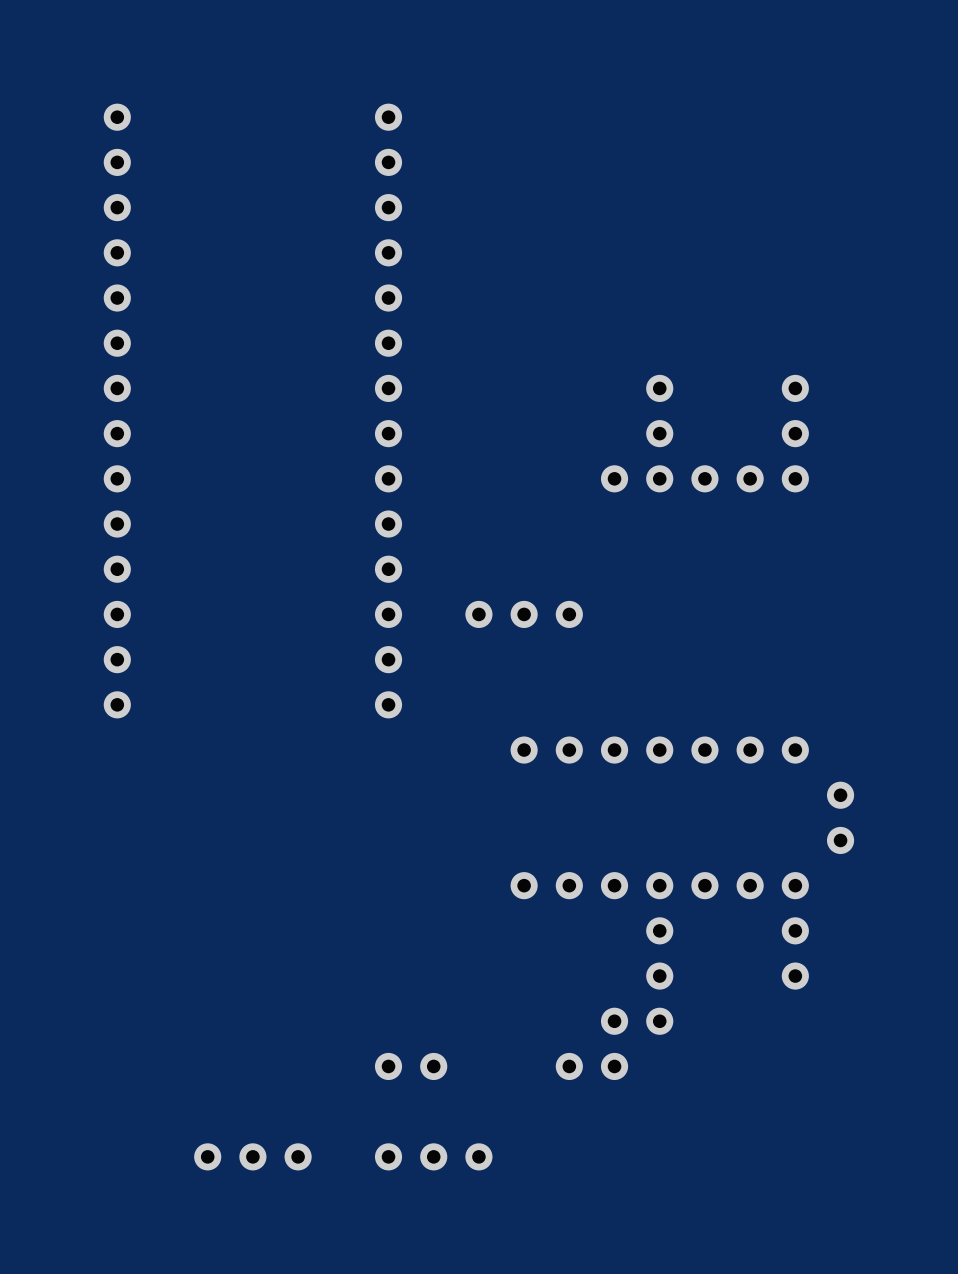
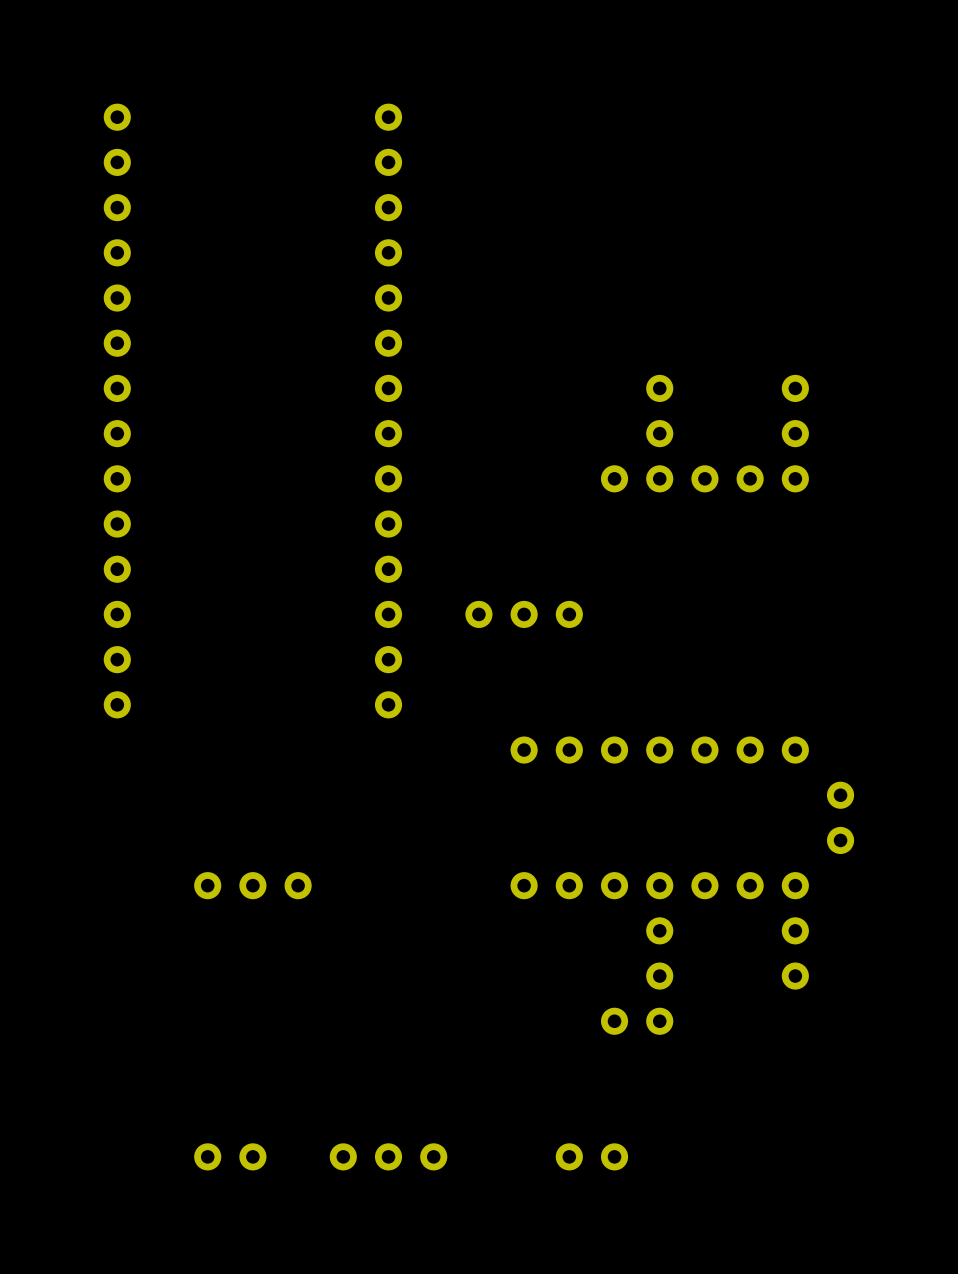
part: none -> (252, 885)
part: (411, 1066) -> none
part position: (591, 1066) -> (591, 1156)
part: (252, 1156) -> none
part position: (433, 1156) -> (388, 1156)

